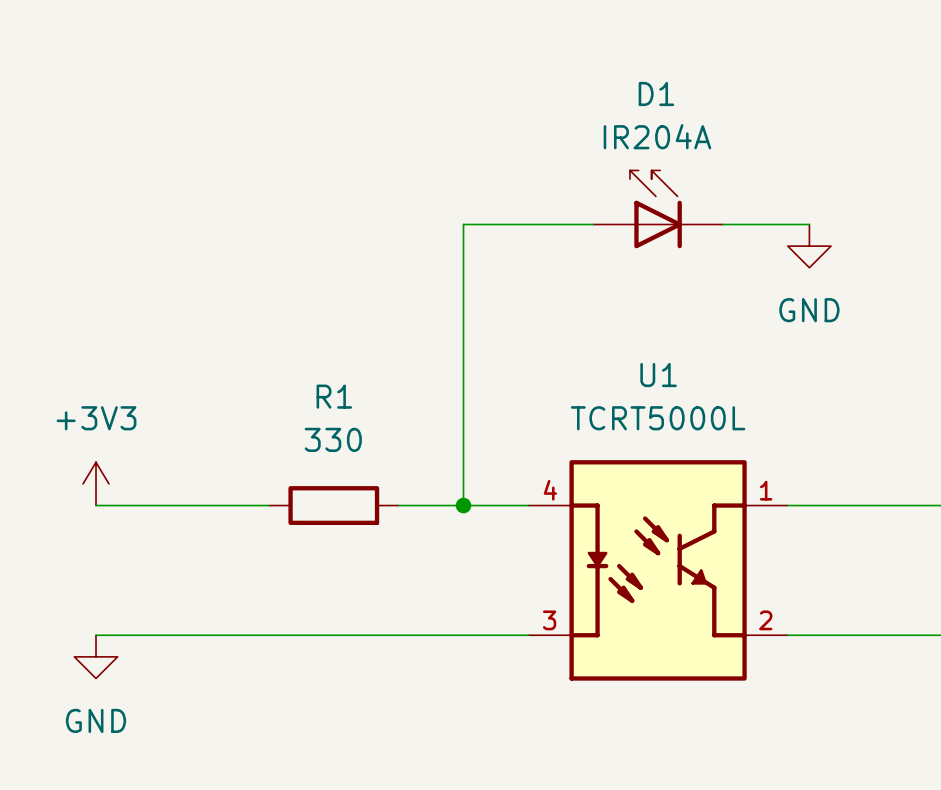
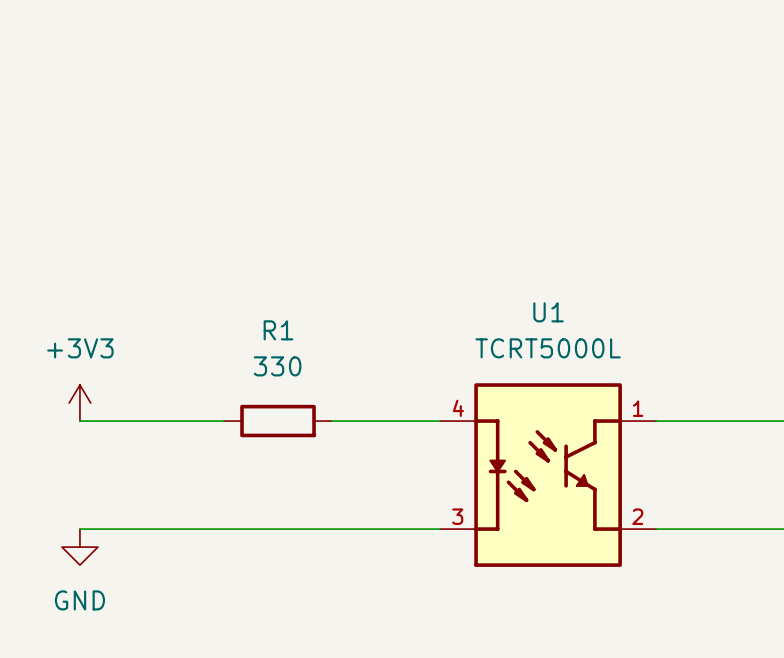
D1: IR204A (658, 209) -> none
wire: (593, 224) (463, 224) (463, 505) -> none
wire: (722, 224) (809, 224) -> none
power symbol: GND (809, 246) -> none
junction: (463, 505) -> none

